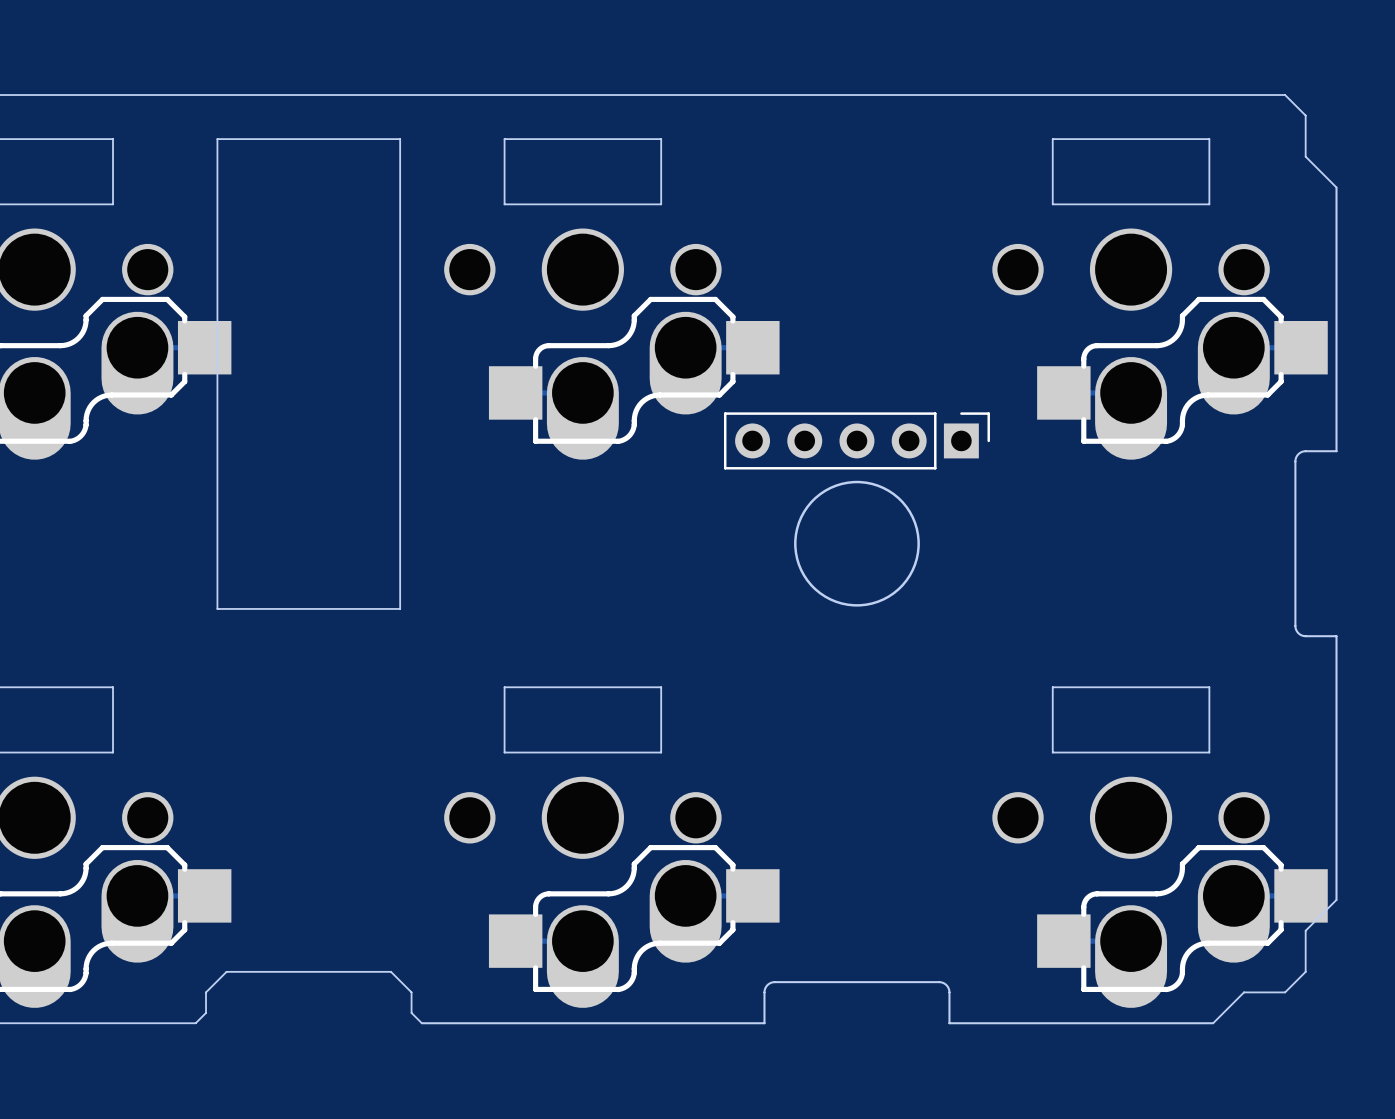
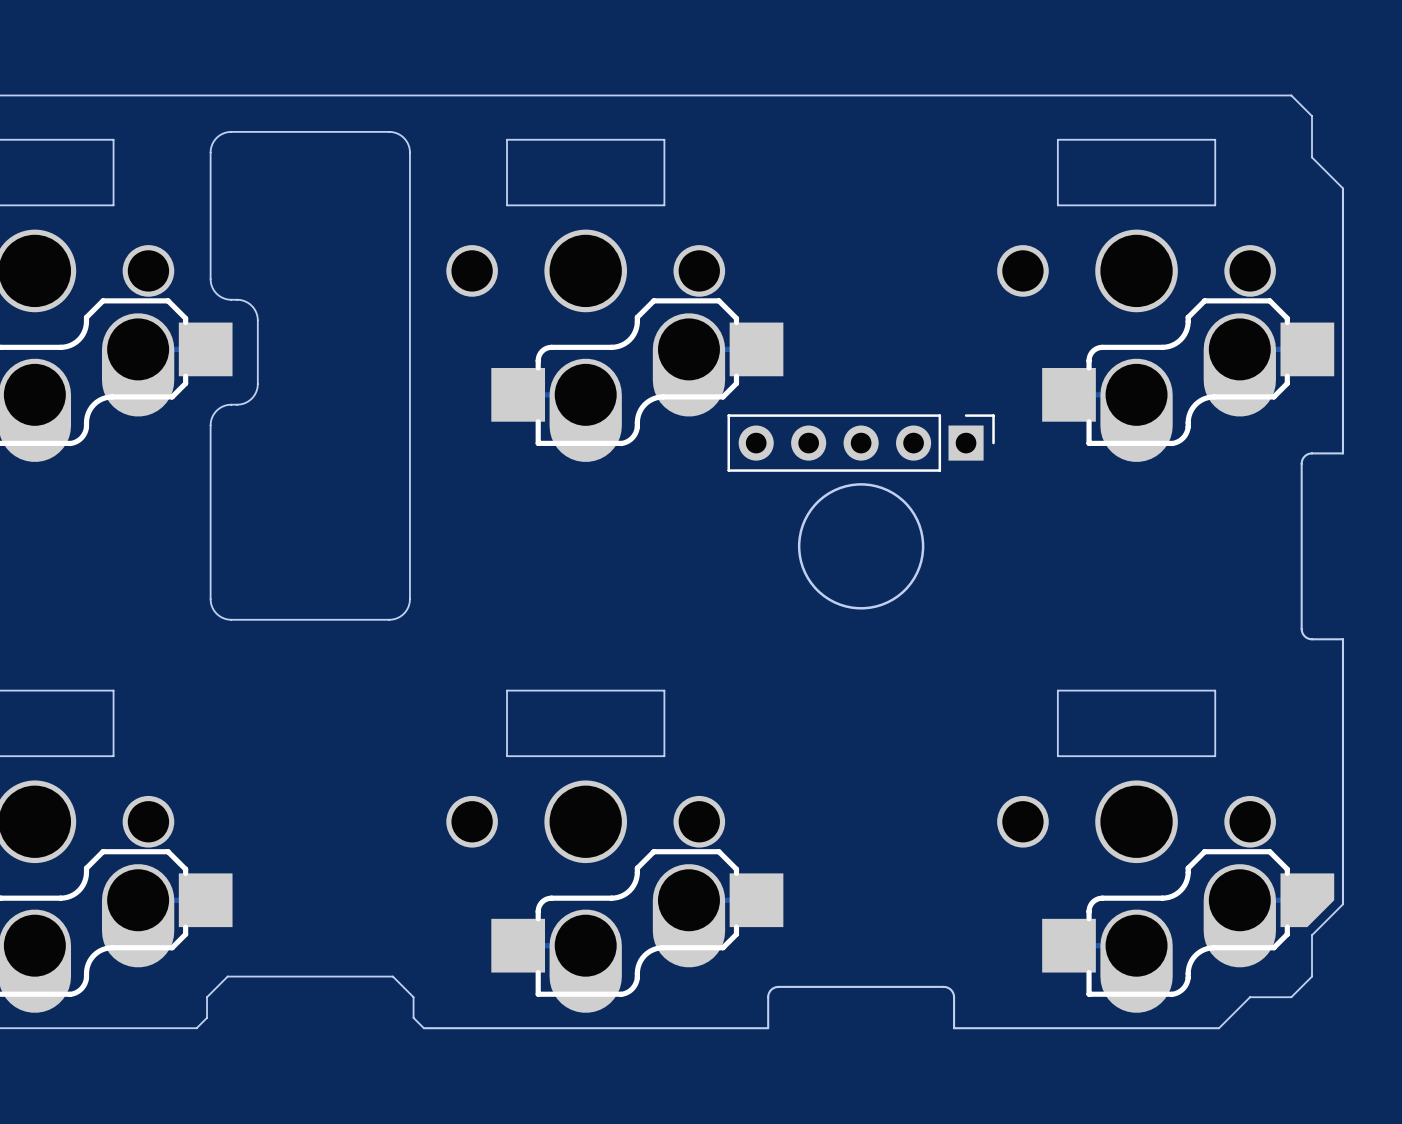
board edge: (400, 139) (217, 139) (217, 608) (400, 608) (400, 139) -> (389, 131) (398, 133) (403, 137) (407, 143) (409, 152) (408, 605) (402, 615) (391, 619) (224, 618) (215, 612) (210, 601) (210, 423) (213, 414) (220, 407) (246, 402) (255, 393) (257, 384) (257, 320) (255, 311) (250, 304) (241, 300) (222, 297) (215, 292) (211, 283) (211, 145) (218, 136) (228, 132) (389, 131)
part footprint: [992, 776, 1328, 1008] -> [997, 780, 1335, 1013]

